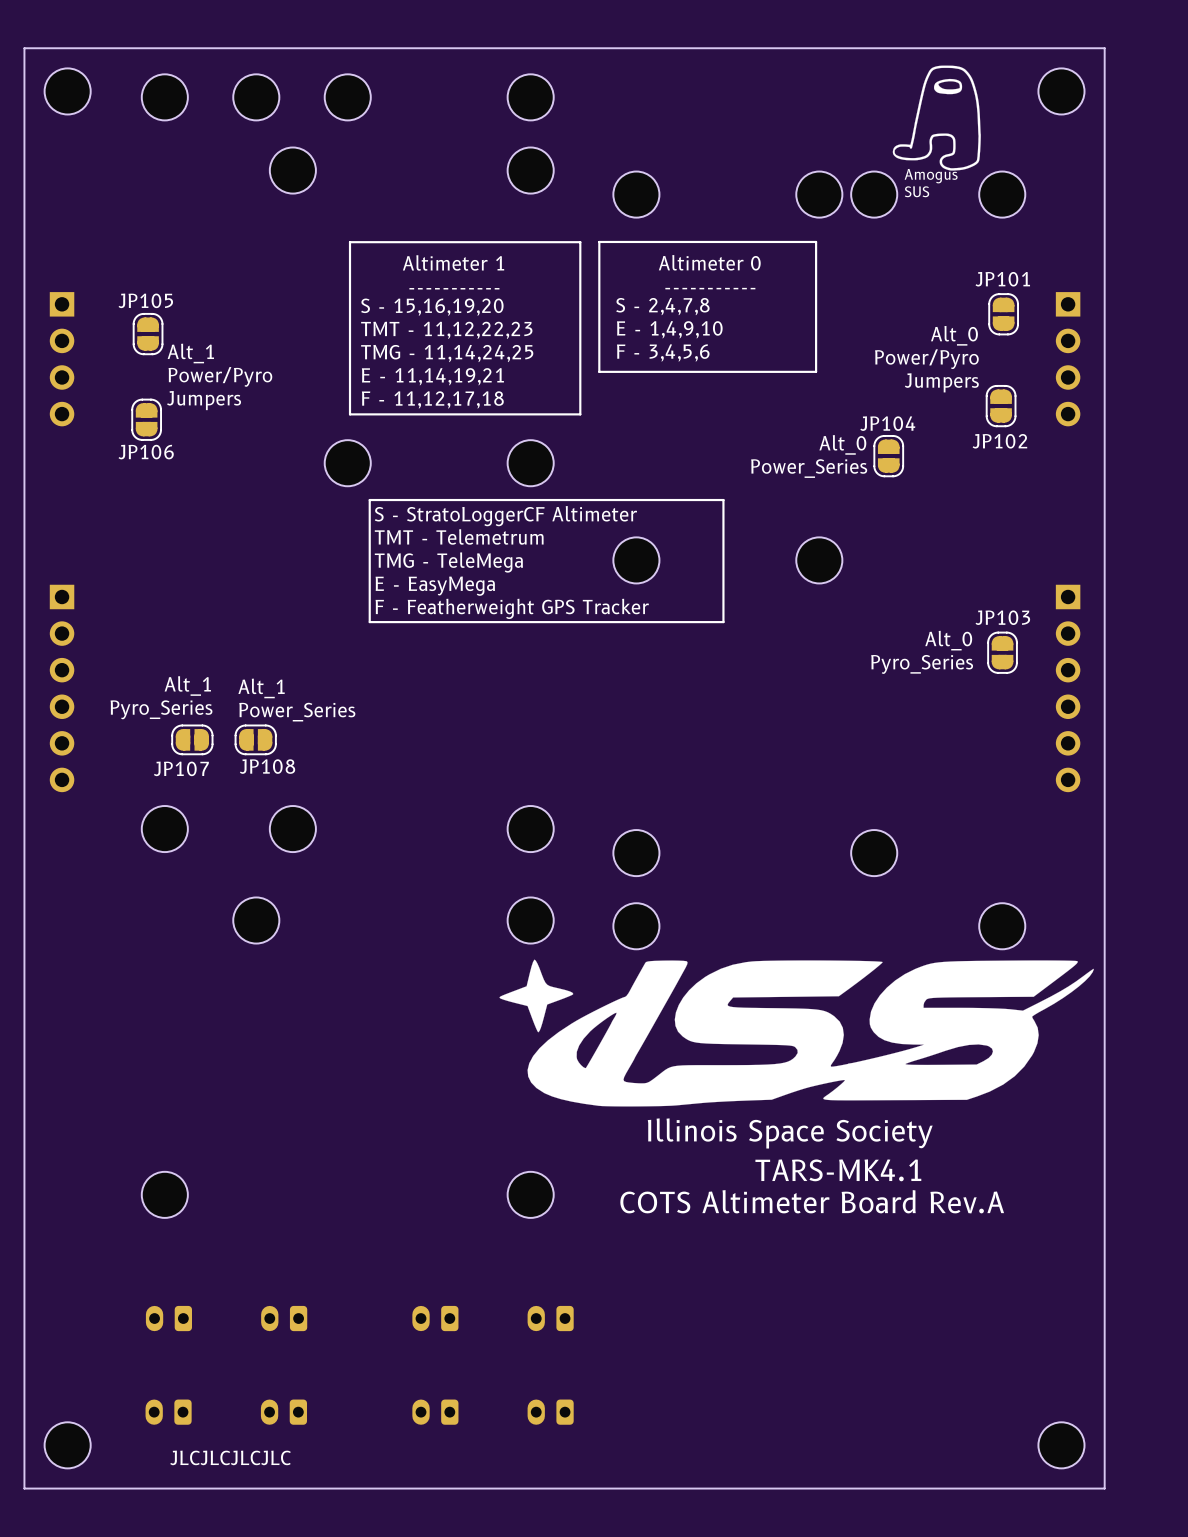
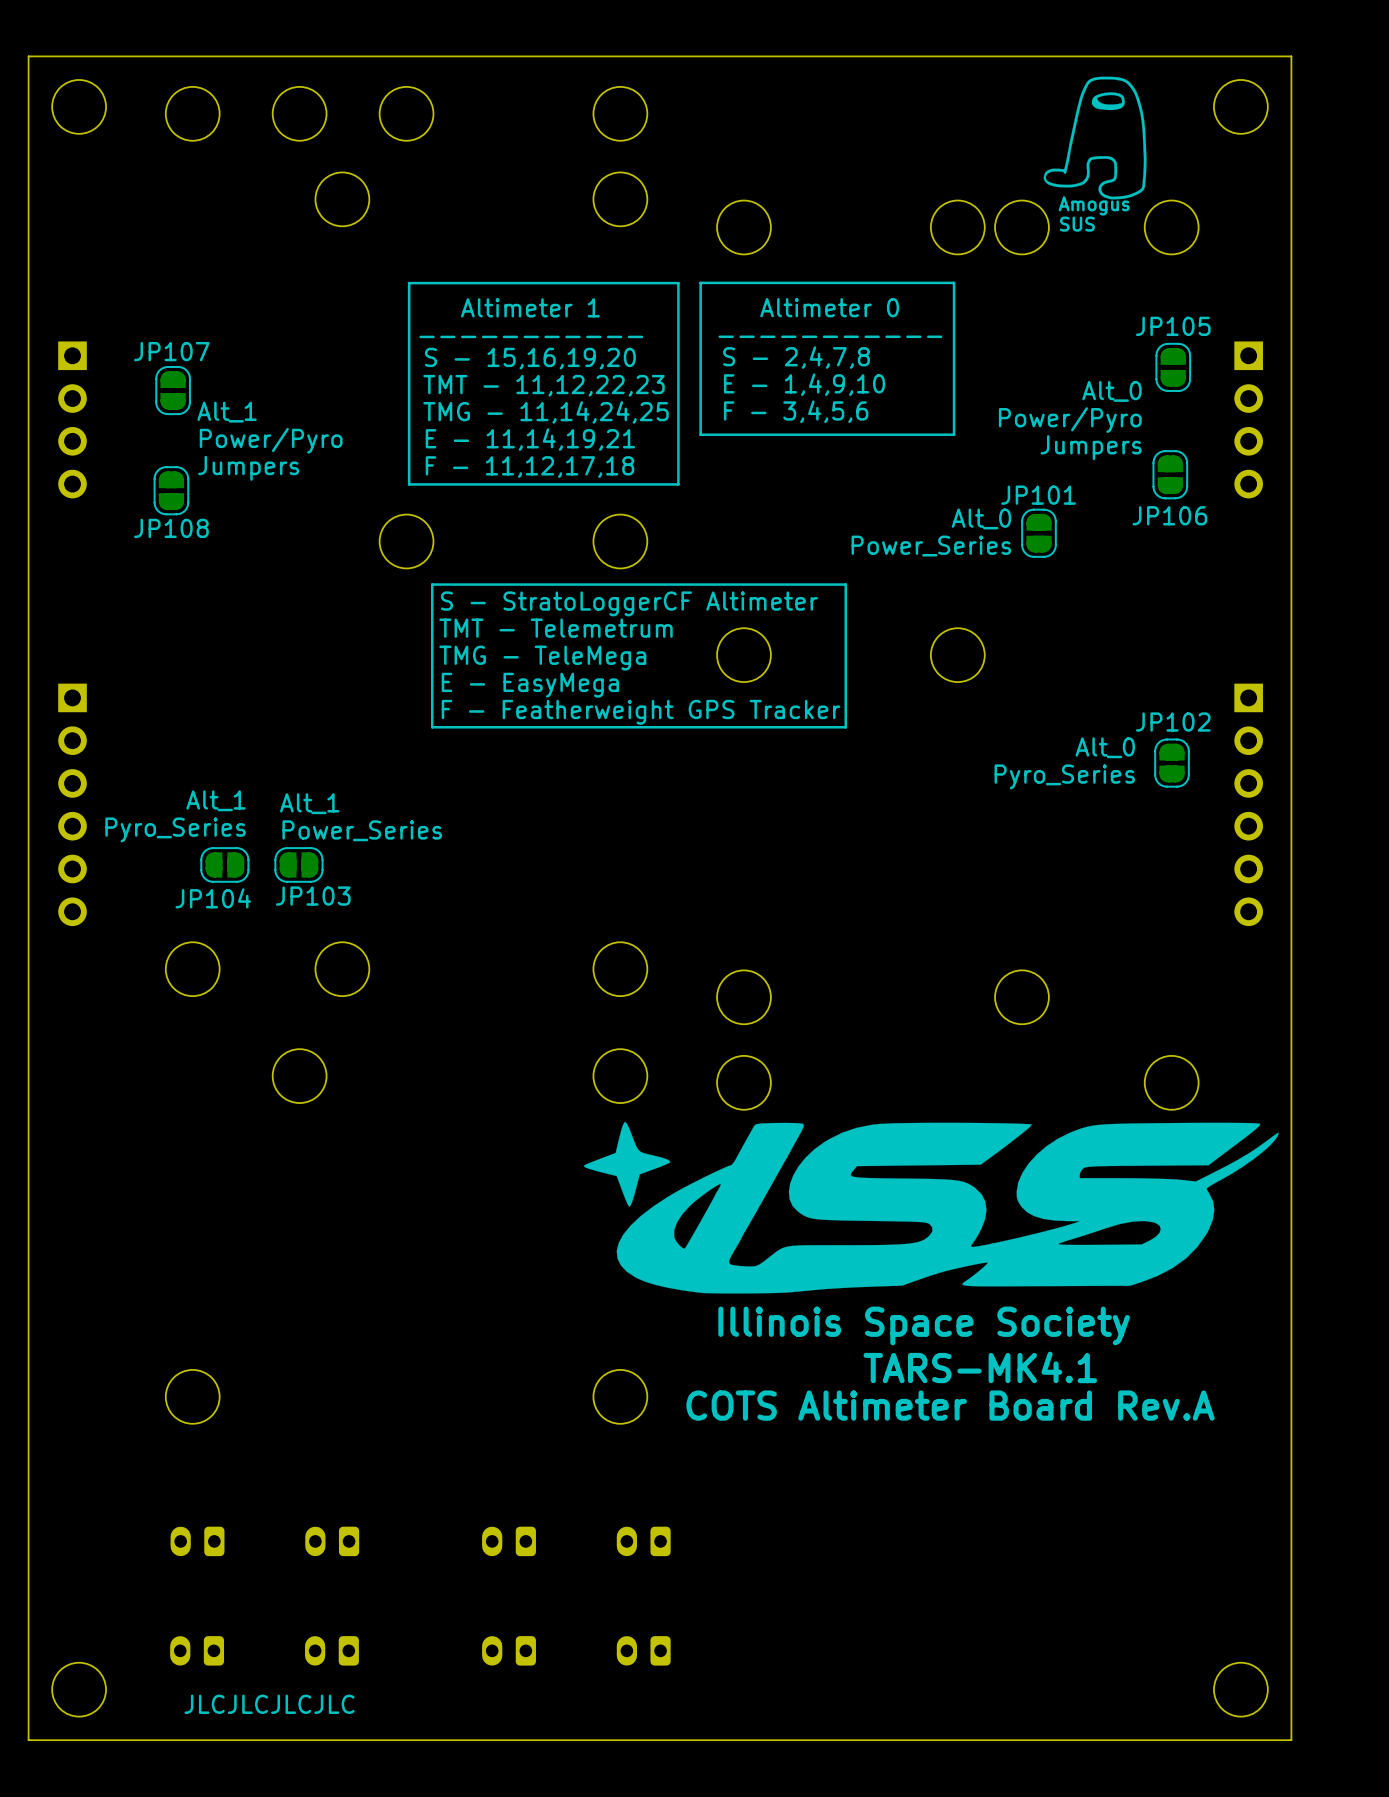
JP101 name: JP101 (1002, 279) -> JP105 (1173, 326)
JP105 name: JP105 (145, 300) -> JP107 (171, 351)
JP104 name: JP104 (887, 423) -> JP101 (1038, 495)
JP102 name: JP102 (999, 441) -> JP106 (1169, 515)
JP106 name: JP106 (146, 452) -> JP108 (171, 528)
JP103 name: JP103 (1002, 617) -> JP102 (1173, 722)
JP108 name: JP108 (267, 766) -> JP103 (313, 896)
JP107 name: JP107 (181, 768) -> JP104 (213, 898)

